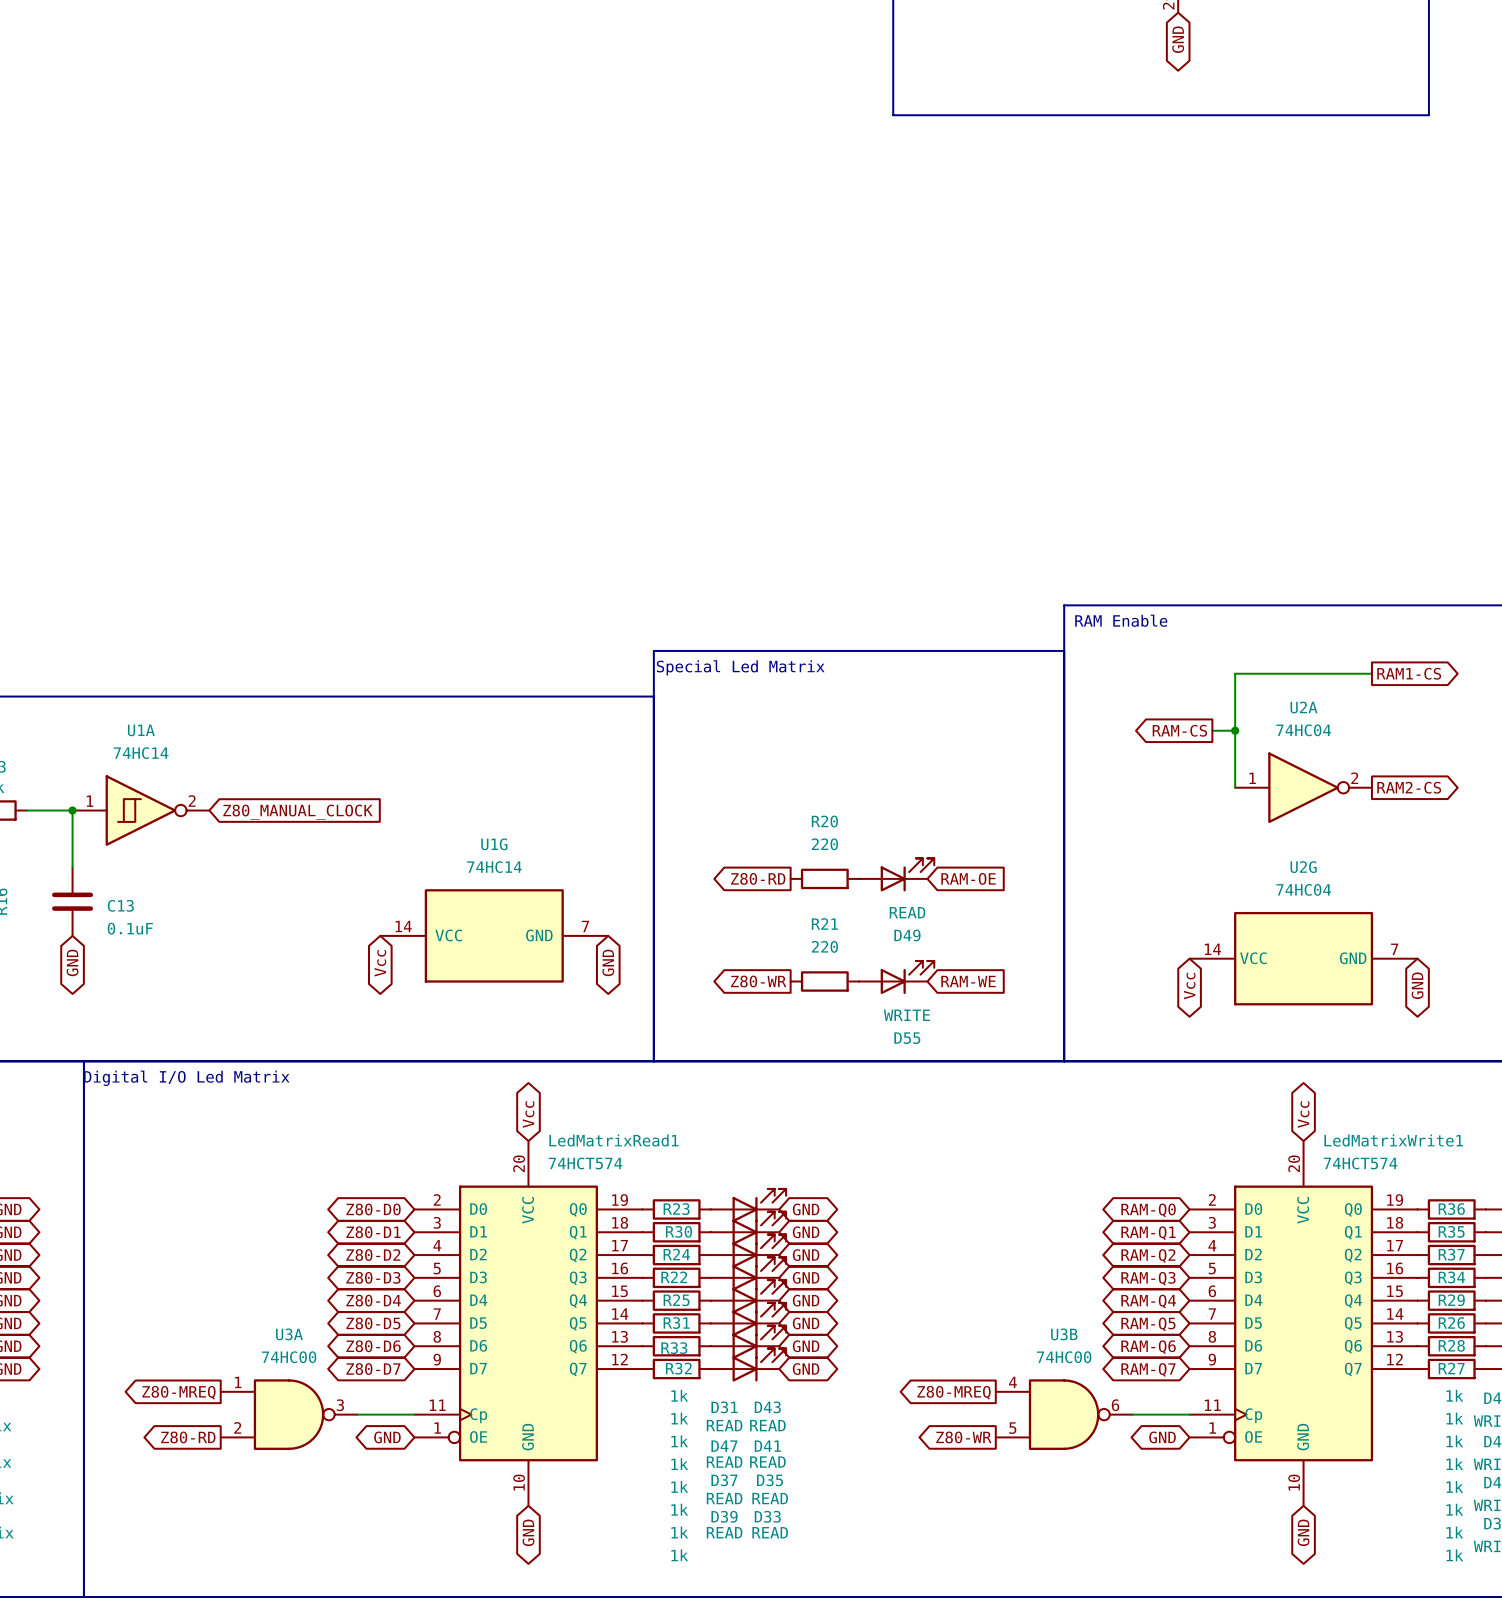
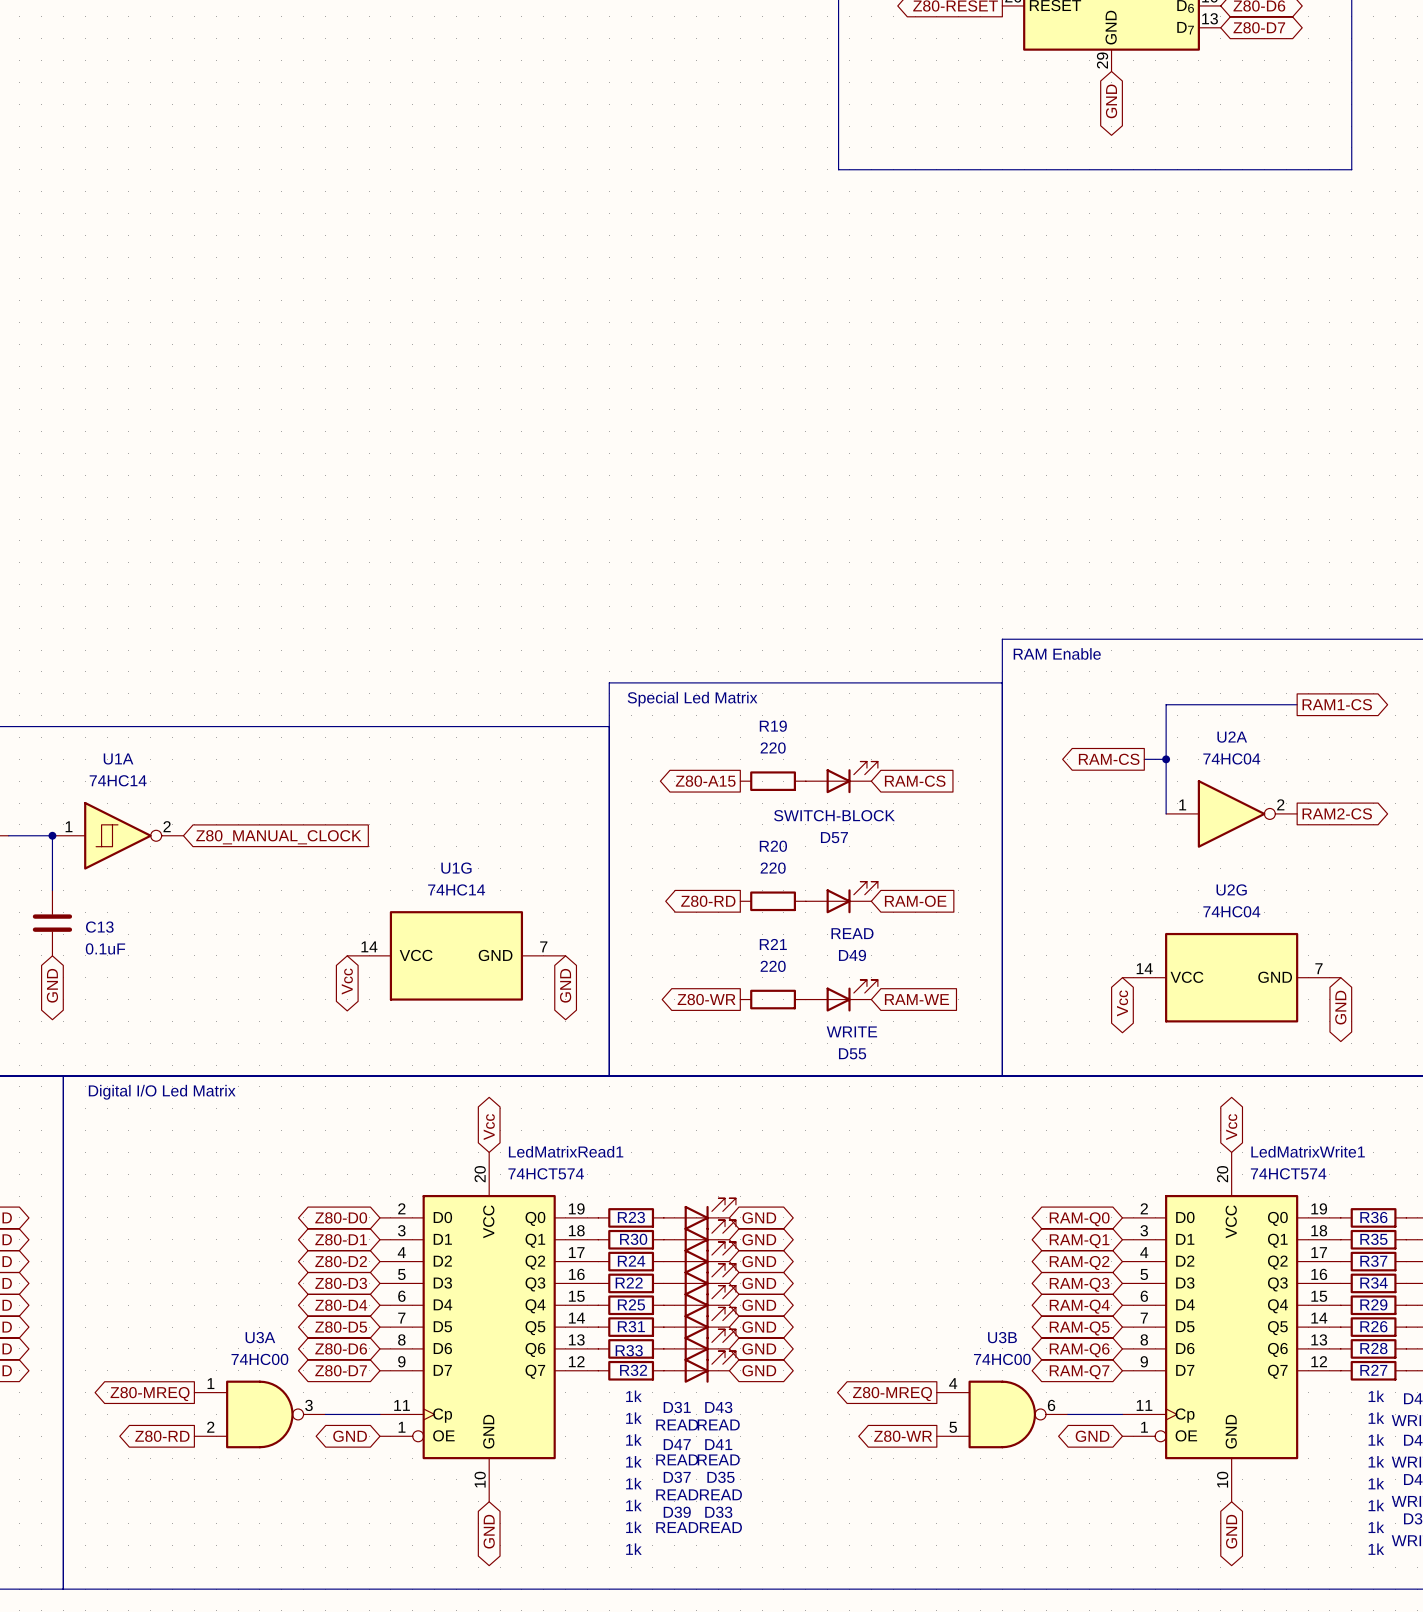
D57: none -> SWITCH-BLOCK (841, 777)
global label: none -> Z80-A15 (705, 781)
R19: none -> 220 (773, 781)
global label: none -> RAM-CS (915, 781)

